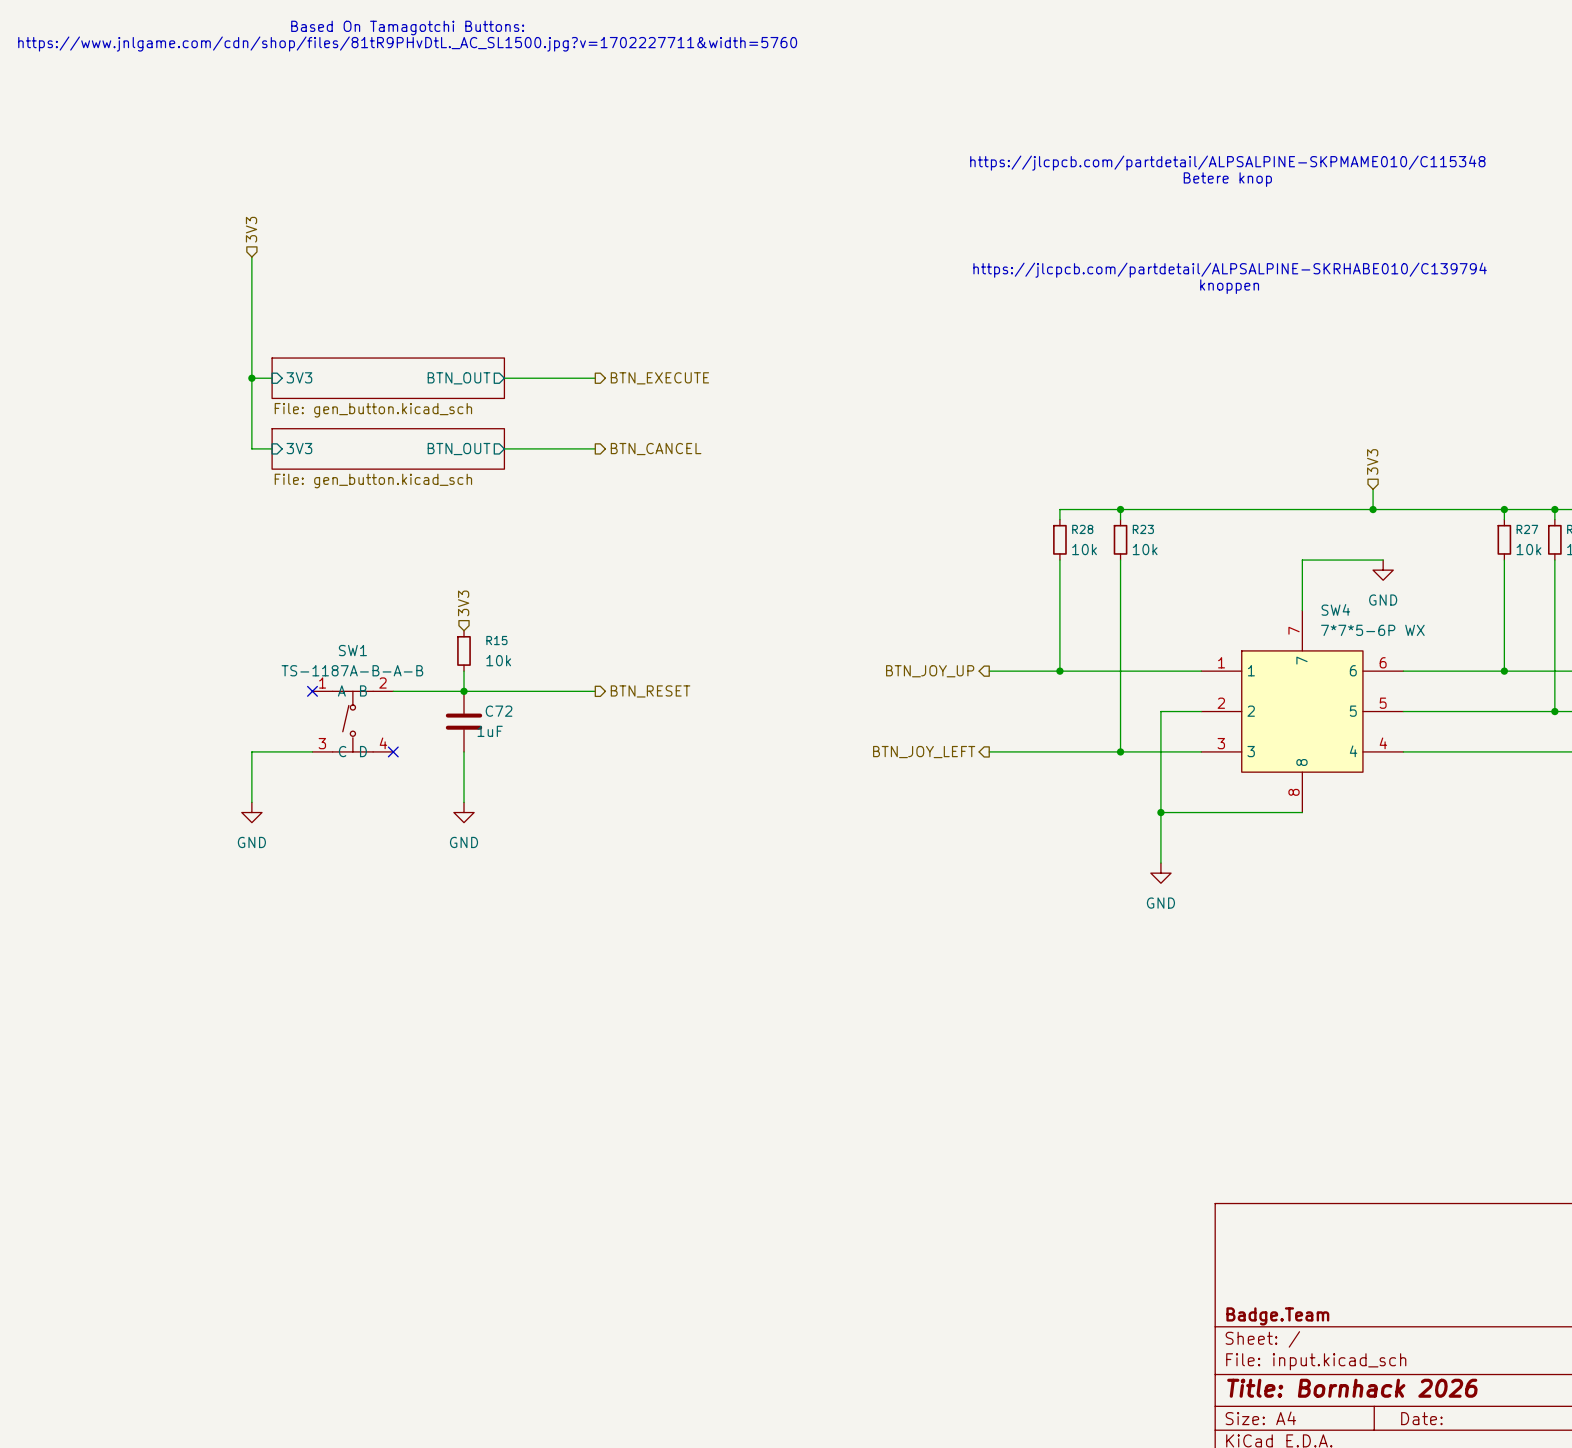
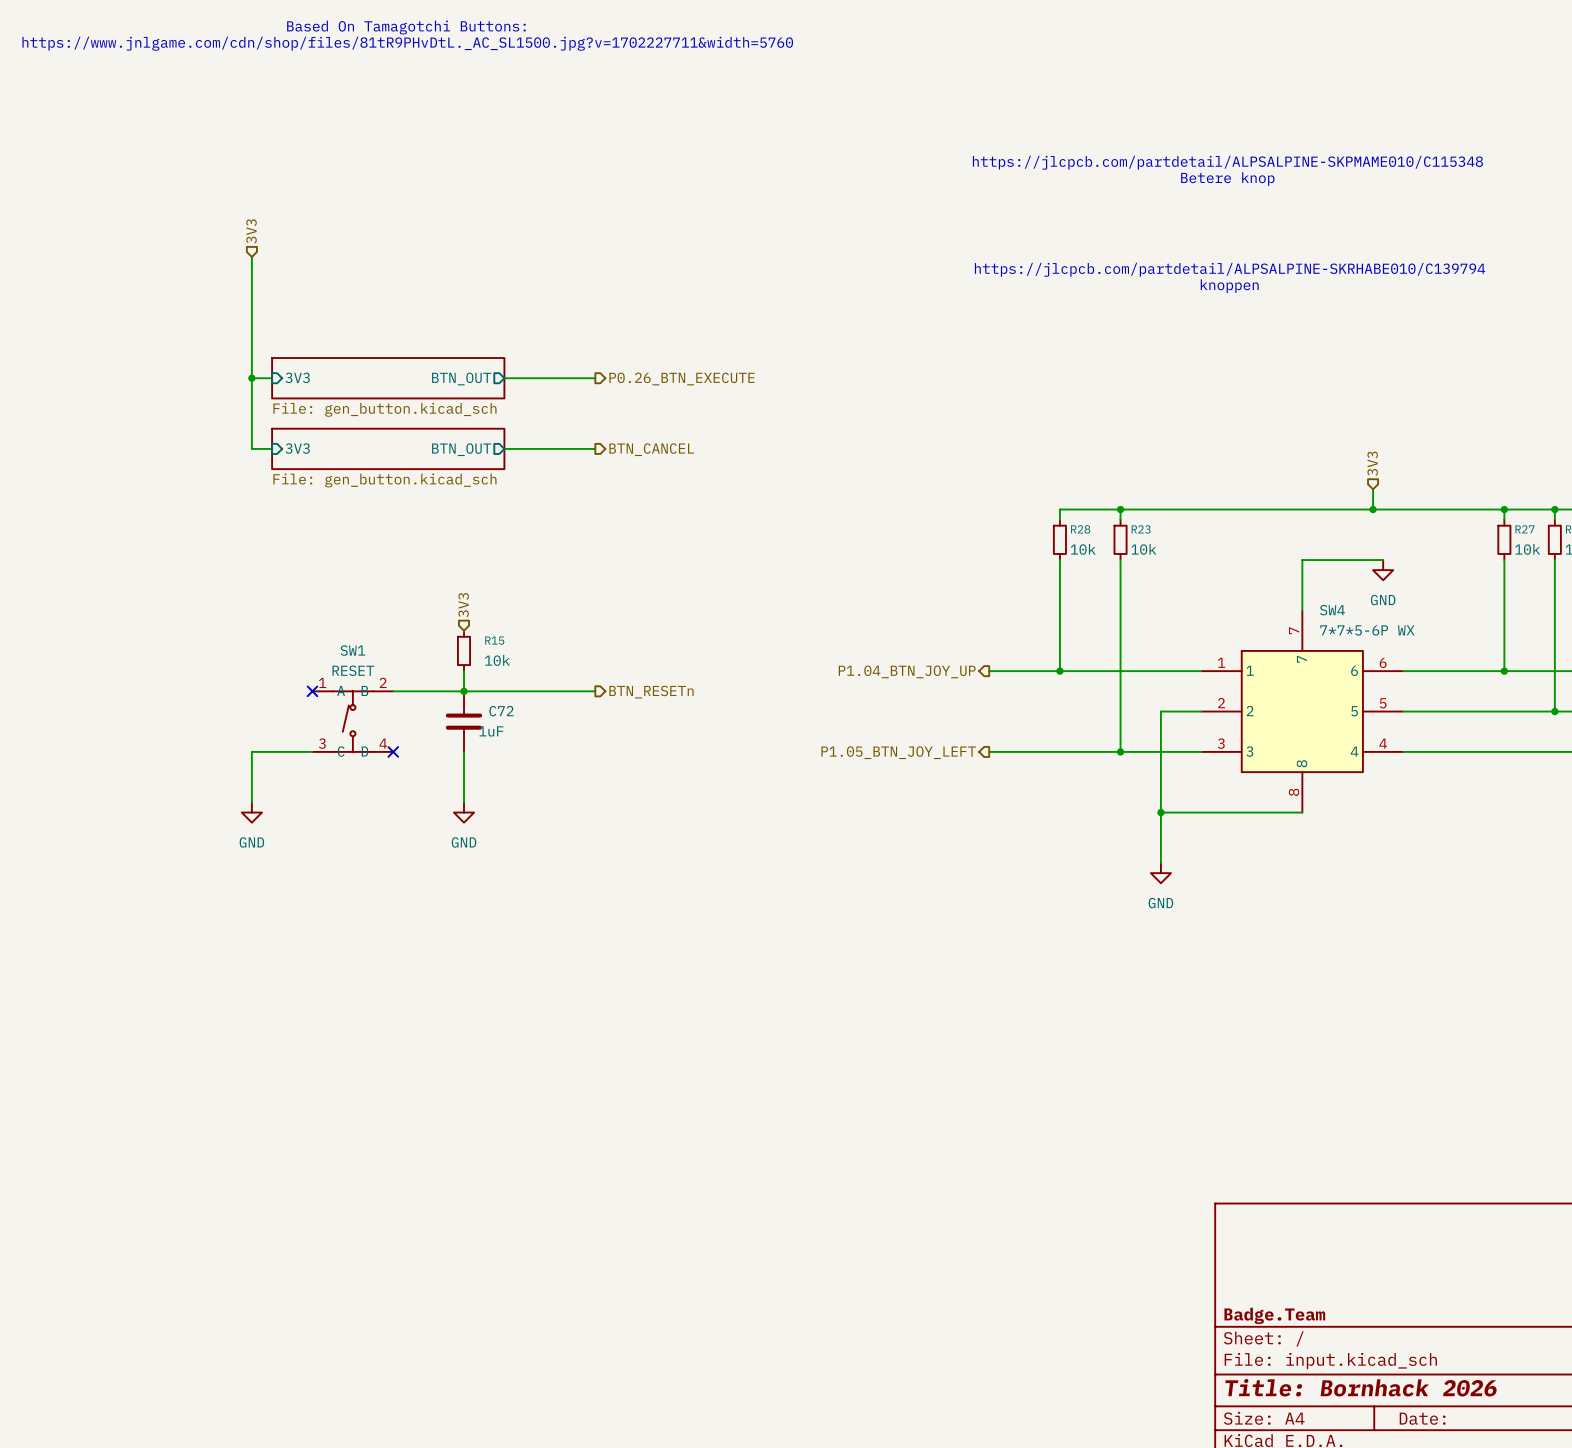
hierarchical label: BTN_EXECUTE (659, 378) -> P0.26_BTN_EXECUTE (682, 378)
SW1 value: TS-1187A-B-A-B (352, 670) -> RESET (353, 670)
hierarchical label: BTN_JOY_UP (930, 671) -> P1.04_BTN_JOY_UP (907, 671)
hierarchical label: BTN_RESET (650, 691) -> BTN_RESETn (651, 692)
hierarchical label: BTN_JOY_LEFT (924, 752) -> P1.05_BTN_JOY_LEFT (898, 752)

